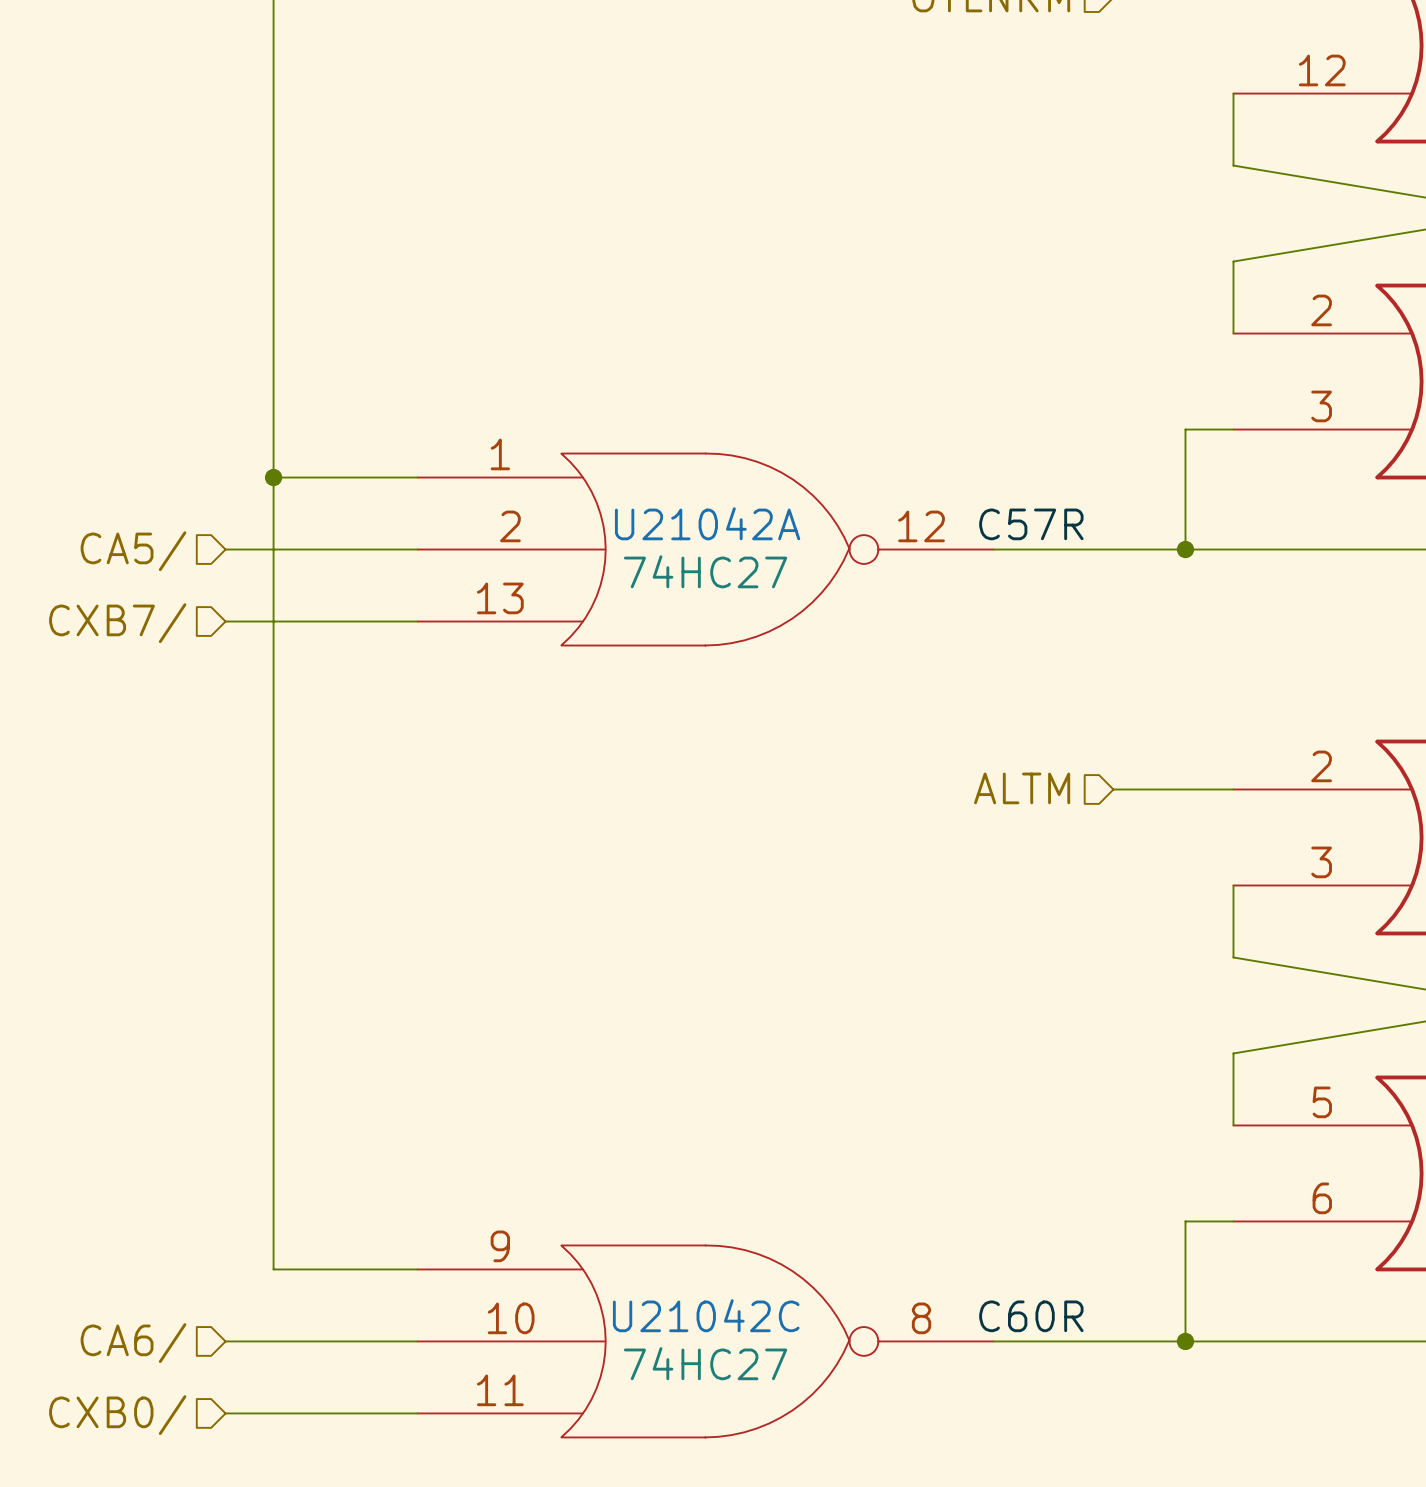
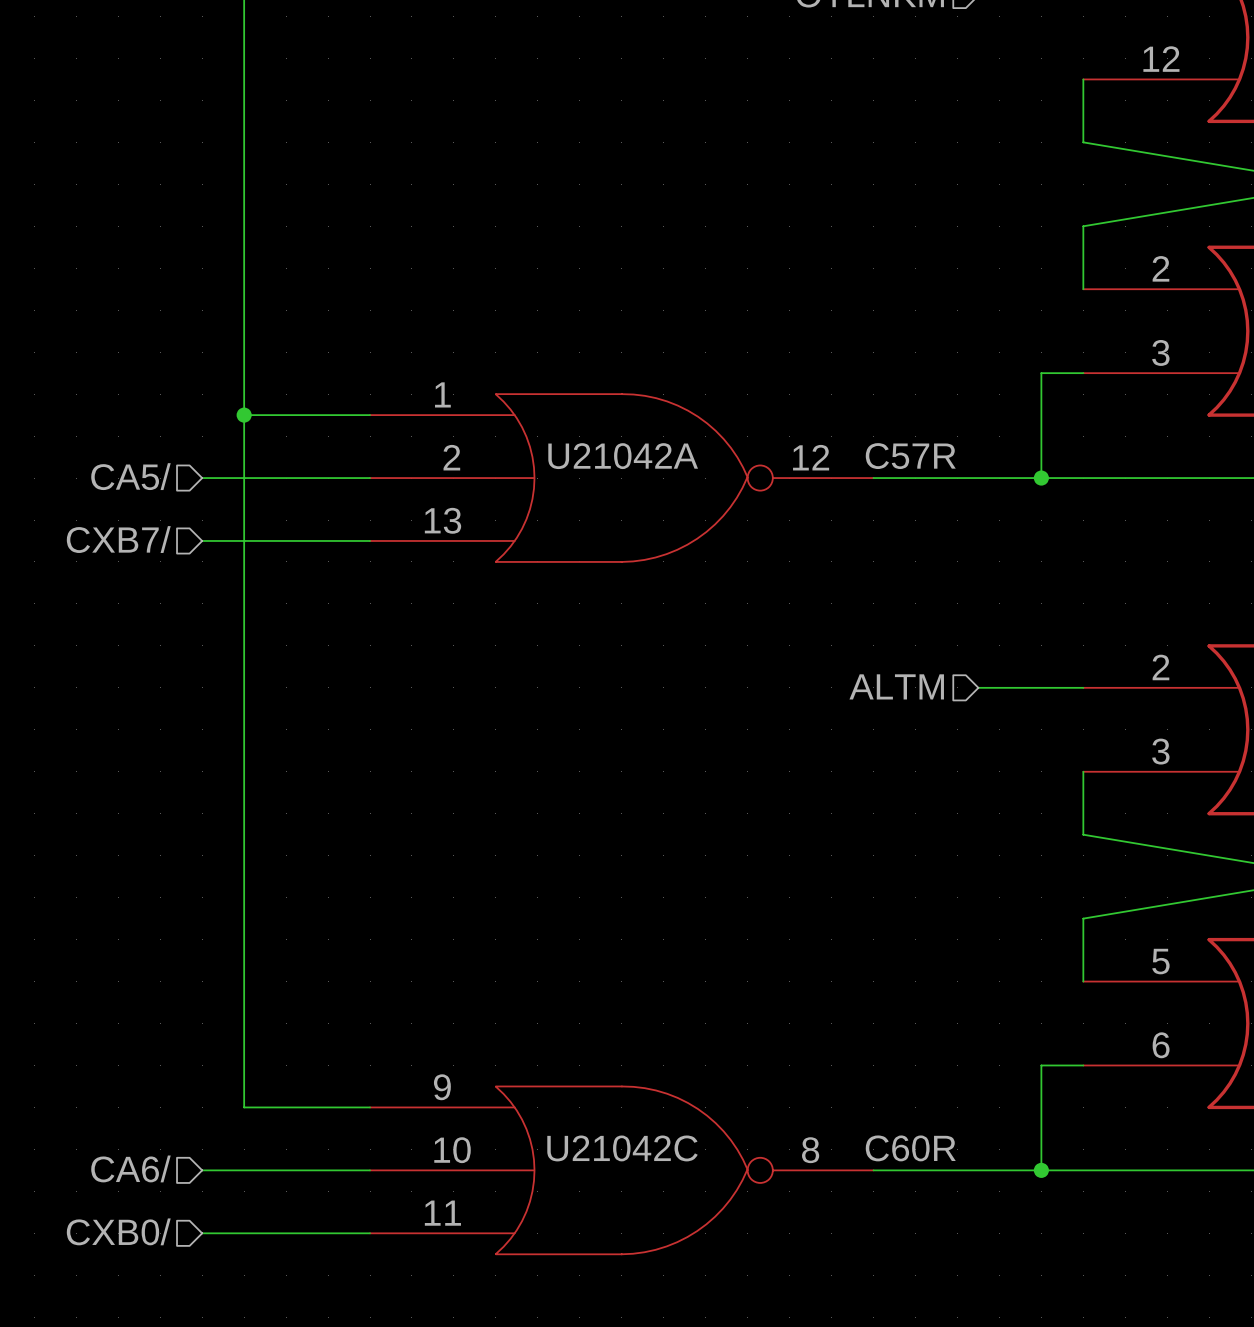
U21042A value: 74HC27 (705, 571) -> none
U21042C value: 74HC27 (705, 1363) -> none

